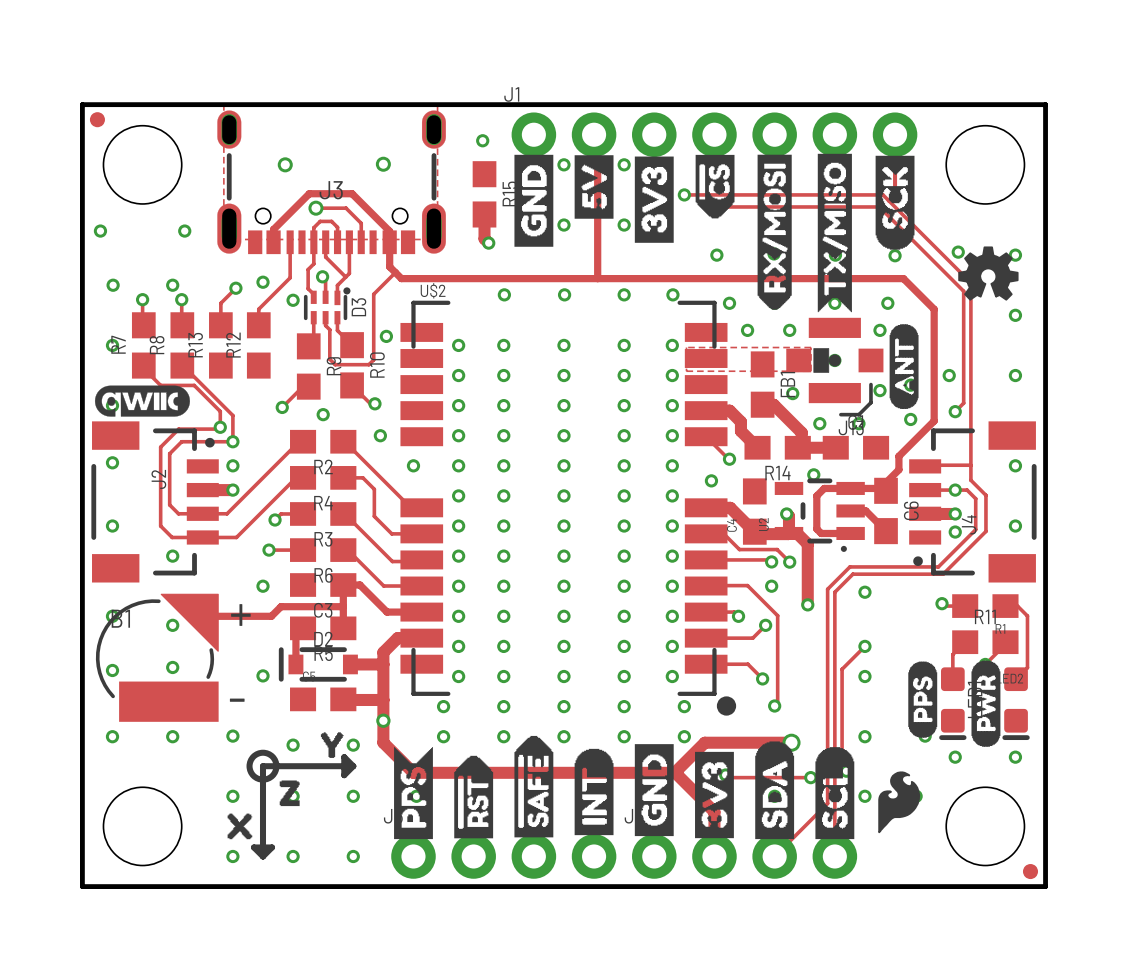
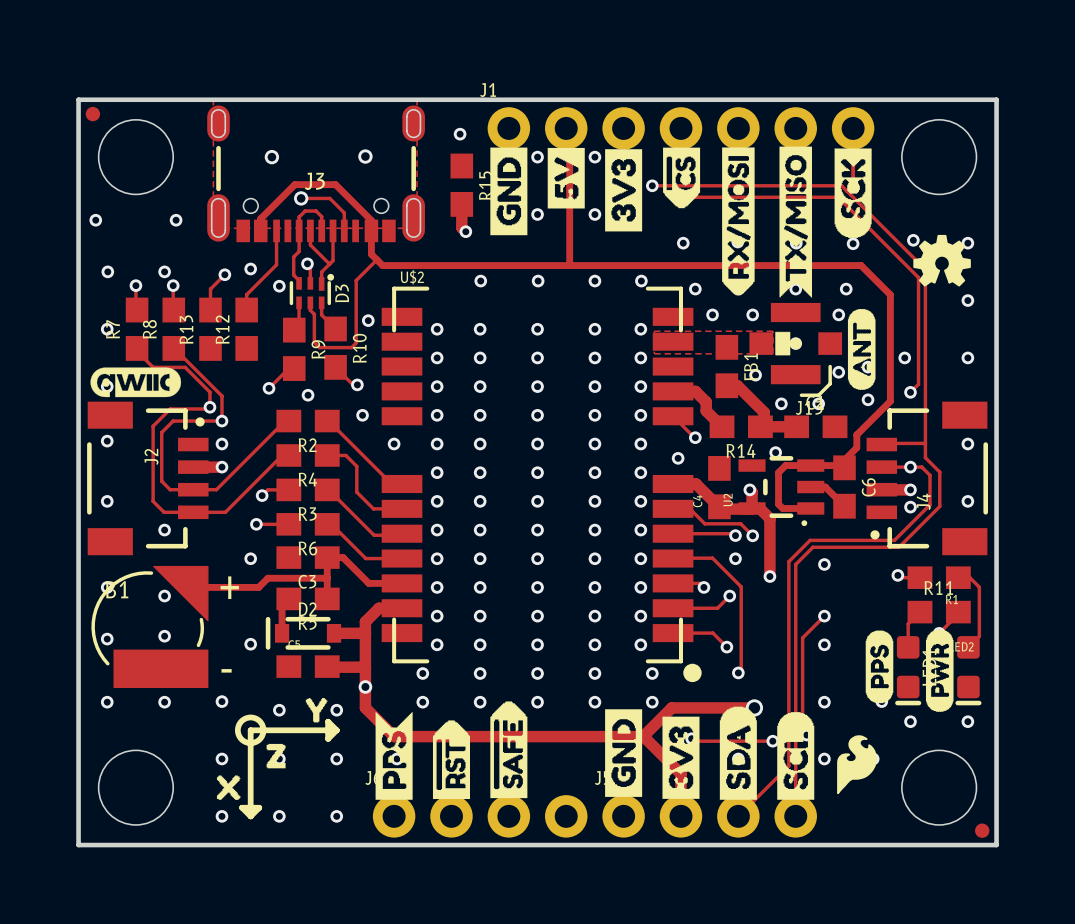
J3 footprint: [217, 110, 446, 255] -> [207, 105, 425, 243]
drawing: [574, 748, 614, 836] -> none

